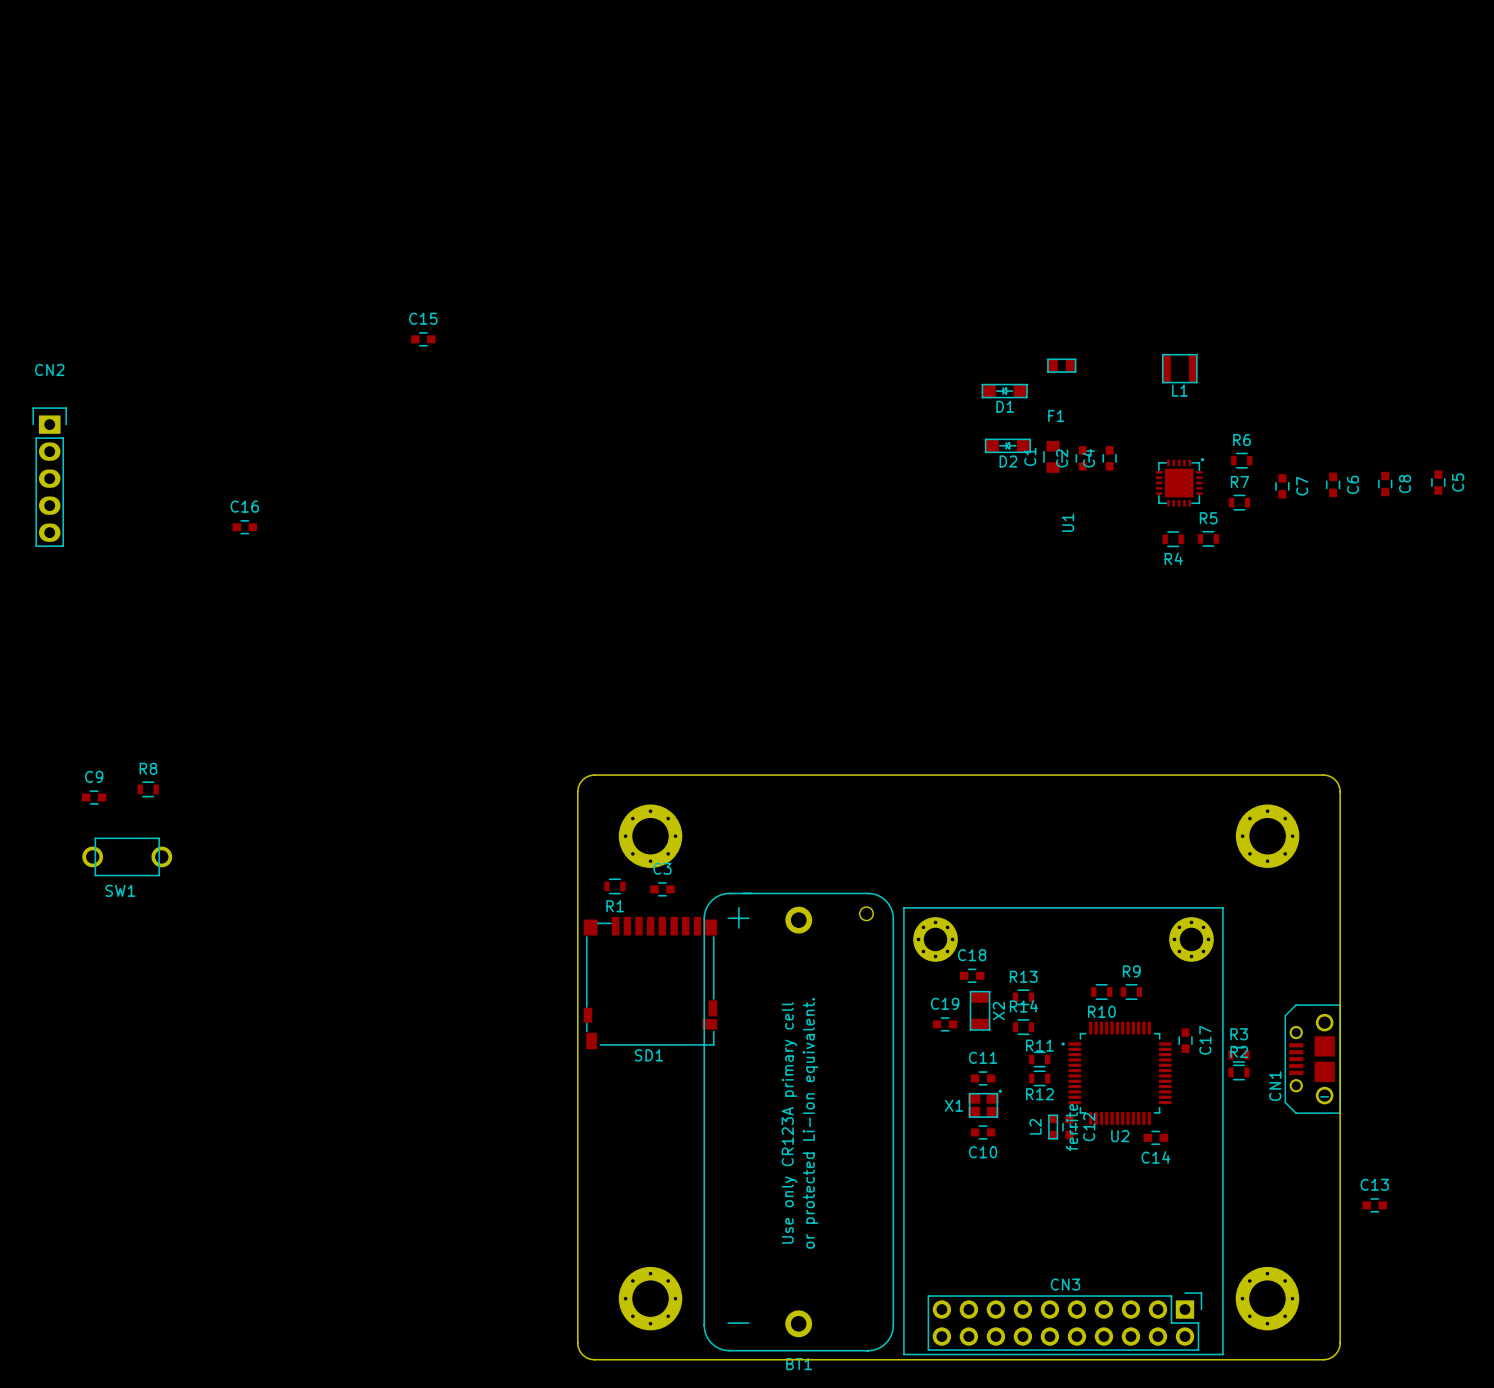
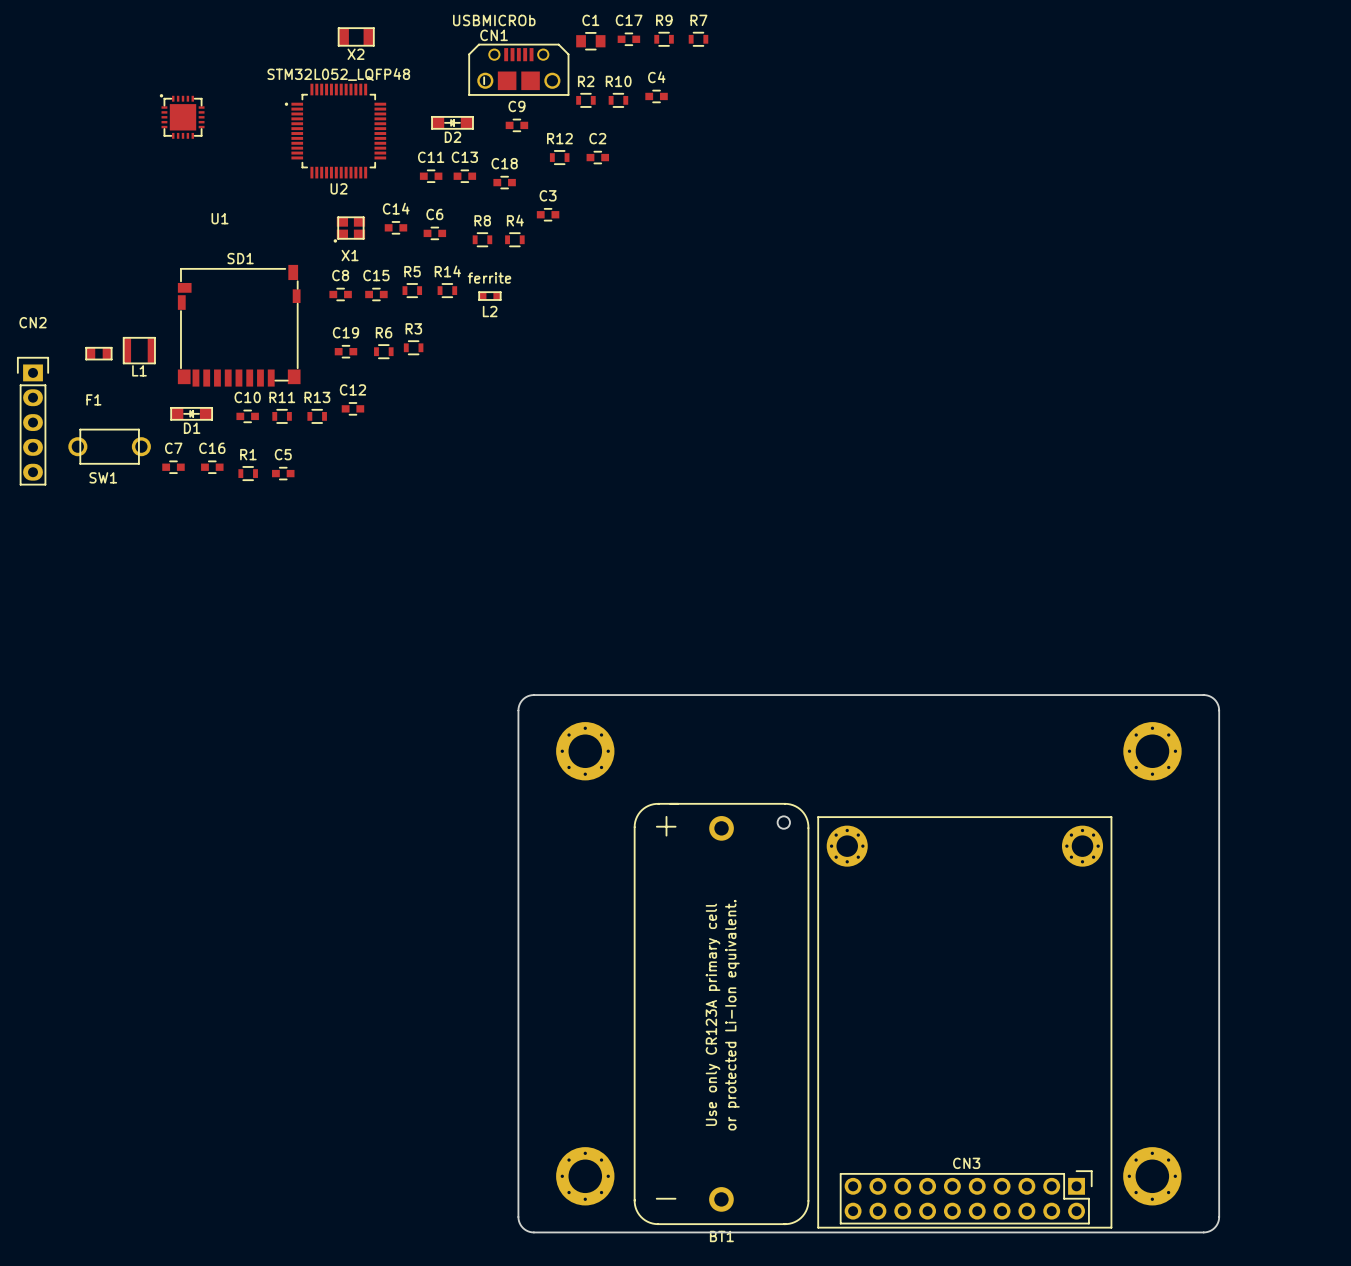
CN1 value: none -> USBMICROb (494, 20)
U2 value: none -> STM32L052_LQFP48 (338, 74)
F1 position: (1061, 365) -> (98, 353)
L1 position: (1179, 368) -> (139, 350)
D1 position: (1004, 391) -> (191, 413)
D2 position: (1007, 445) -> (452, 122)
C1 rotation: 0° (1053, 456) -> 90° clockwise (590, 41)
C1 position: (1053, 456) -> (590, 41)
C2 rotation: 0° (1082, 458) -> 90° clockwise (597, 157)
C2 position: (1082, 458) -> (597, 157)
C4 rotation: 0° (1109, 458) -> 90° clockwise (656, 96)
C4 position: (1109, 458) -> (656, 96)
R6 position: (1241, 460) -> (383, 351)
U1 rotation: 0° (1179, 482) -> 90° counterclockwise (182, 116)
U1 position: (1179, 482) -> (182, 116)
C5 rotation: 0° (1438, 482) -> 90° clockwise (283, 473)
C5 position: (1438, 482) -> (283, 473)
C5 name position: C5 (1458, 482) -> C5 (283, 454)
C6 rotation: 0° (1333, 484) -> 90° clockwise (434, 233)
C6 position: (1333, 484) -> (434, 233)
C6 name position: C6 (1352, 484) -> C6 (434, 214)
C8 rotation: 0° (1385, 484) -> 90° clockwise (340, 294)
C8 position: (1385, 484) -> (340, 294)
C8 name position: C8 (1405, 484) -> C8 (340, 275)
C7 rotation: 0° (1282, 486) -> 90° clockwise (173, 467)
C7 position: (1282, 486) -> (173, 467)
C7 name position: C7 (1302, 486) -> C7 (173, 448)
R7 position: (1239, 502) -> (698, 39)
R5 position: (1208, 538) -> (412, 290)
R4 position: (1173, 539) -> (514, 239)
R4 name position: R4 (1173, 558) -> R4 (515, 220)
R8 position: (148, 789) -> (482, 239)
C9 position: (94, 797) -> (516, 125)
SW1 position: (127, 856) -> (109, 446)
R1 position: (614, 886) -> (248, 473)
C3 position: (662, 889) -> (548, 214)
R1 name position: R1 (615, 906) -> R1 (248, 454)
C18 position: (972, 975) -> (504, 182)
SD1 rotation: 0° (650, 983) -> 180° (239, 325)
SD1 position: (650, 983) -> (239, 325)
R10 position: (1101, 991) -> (618, 100)
R9 position: (1131, 991) -> (664, 39)
R13 position: (1023, 997) -> (317, 416)
X2 rotation: 0° (980, 1010) -> 90° clockwise (356, 36)
X2 position: (980, 1010) -> (356, 36)
R10 name position: R10 (1101, 1011) -> R10 (618, 81)
C19 position: (945, 1024) -> (345, 351)
R14 position: (1023, 1027) -> (447, 290)
C17 rotation: 0° (1185, 1040) -> 90° clockwise (628, 39)
C17 position: (1185, 1040) -> (628, 39)
C17 name position: C17 (1205, 1040) -> C17 (629, 20)
R11 name position: R11 (1039, 1045) -> R11 (282, 397)
R3 position: (1238, 1054) -> (413, 347)
R11 position: (1039, 1059) -> (282, 416)
CN1 rotation: 0° (1312, 1059) -> 90° clockwise (518, 69)
CN1 position: (1312, 1059) -> (518, 69)
R2 position: (1238, 1072) -> (585, 100)
U2 position: (1116, 1073) -> (335, 131)
C11 position: (983, 1078) -> (431, 176)
R12 position: (1039, 1078) -> (559, 157)
R12 name position: R12 (1039, 1094) -> R12 (559, 138)
X1 rotation: 0° (985, 1103) -> 180° (349, 229)
X1 position: (985, 1103) -> (349, 229)
X1 name position: X1 (953, 1105) -> X1 (350, 255)
L2 rotation: 0° (1053, 1127) -> 90° counterclockwise (489, 296)
L2 position: (1053, 1127) -> (489, 296)
C12 rotation: 0° (1069, 1127) -> 90° clockwise (352, 408)
C12 position: (1069, 1127) -> (352, 408)
C12 name position: C12 (1089, 1127) -> C12 (352, 389)
C10 position: (983, 1132) -> (247, 416)
C14 position: (1155, 1137) -> (395, 227)
C10 name position: C10 (983, 1152) -> C10 (247, 397)
C14 name position: C14 (1155, 1157) -> C14 (396, 208)
C13 position: (1374, 1205) -> (464, 176)

